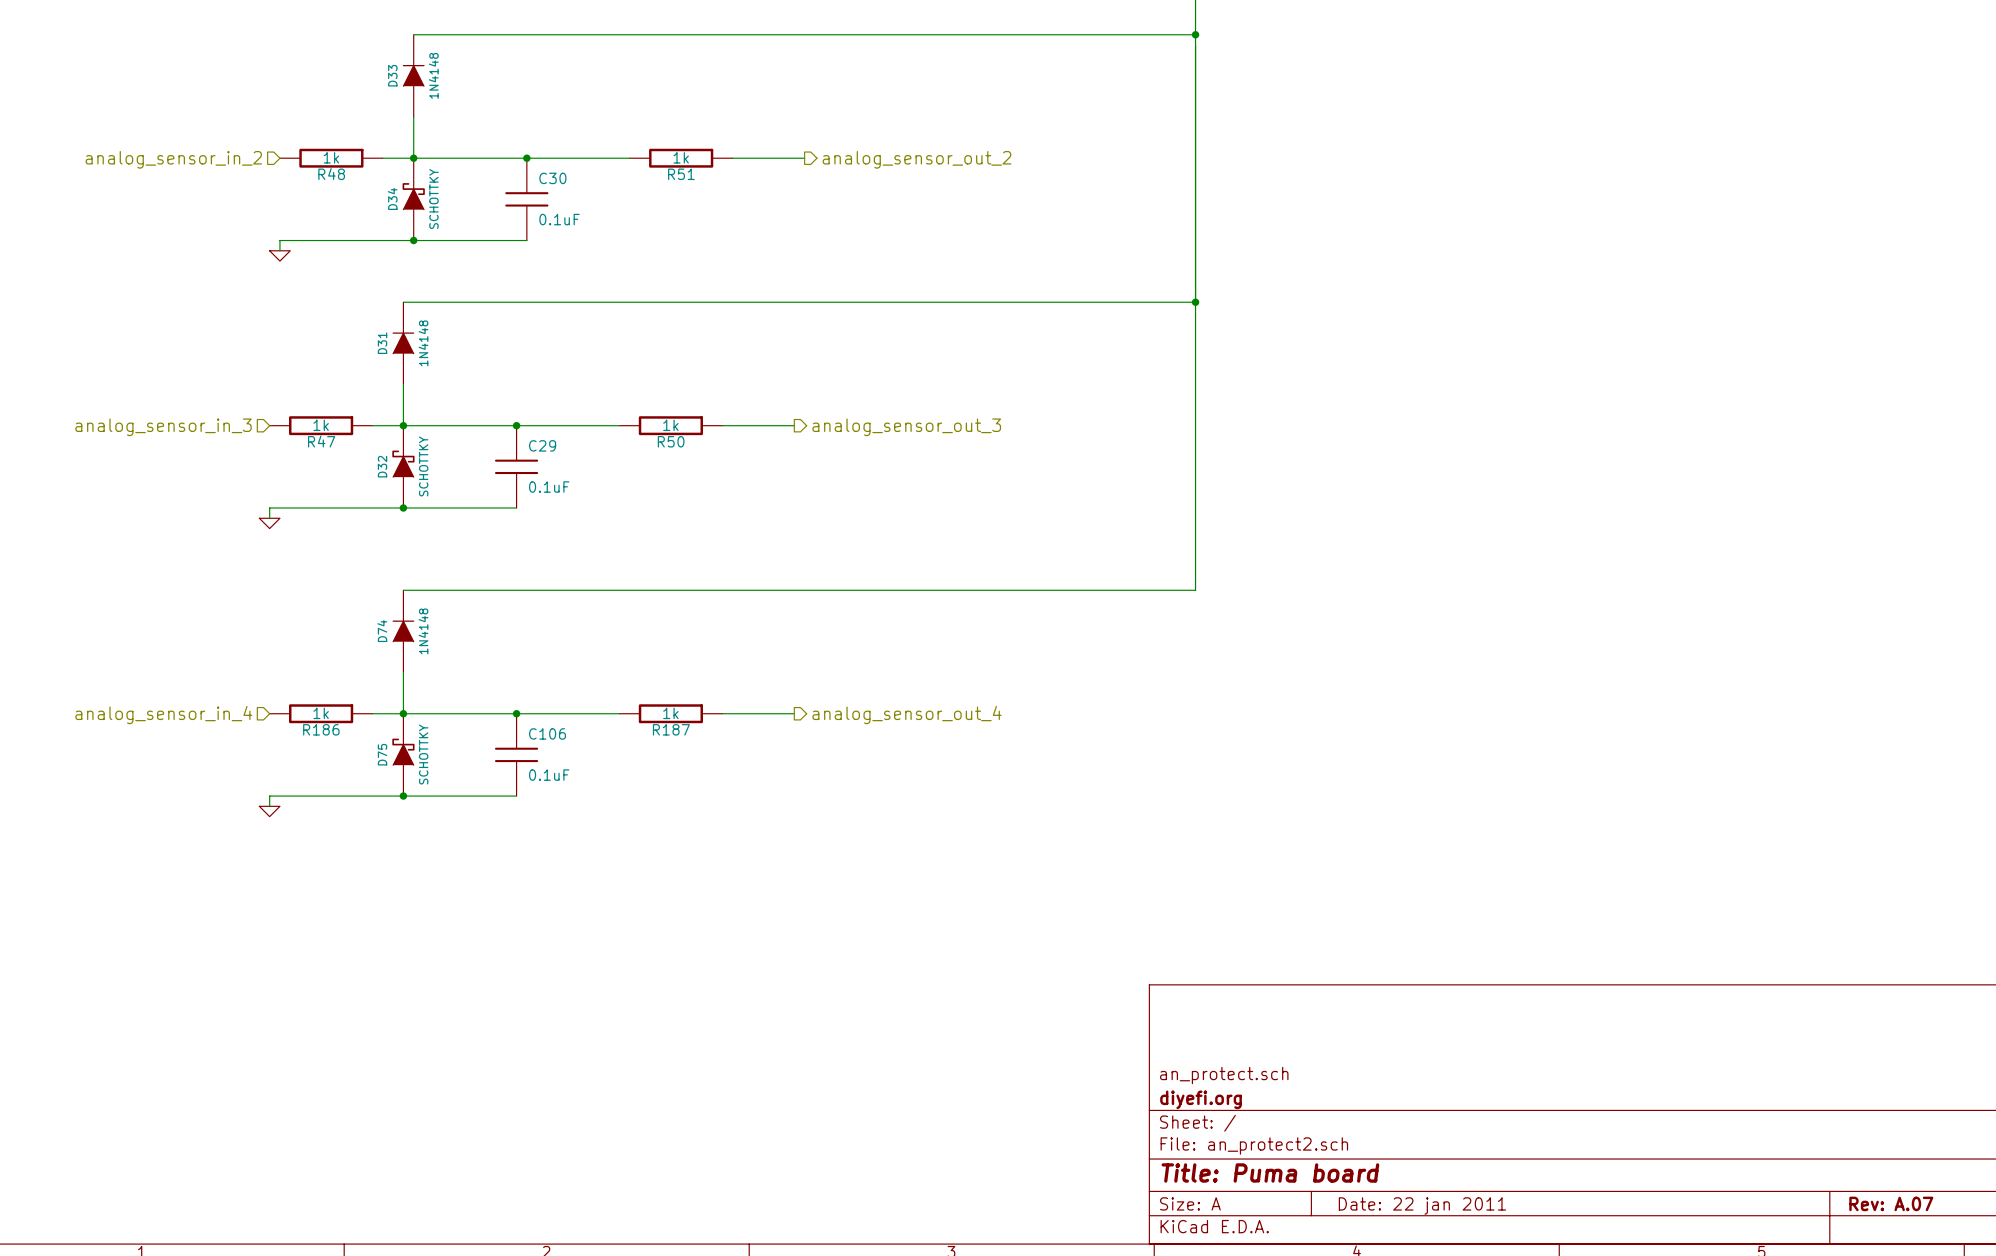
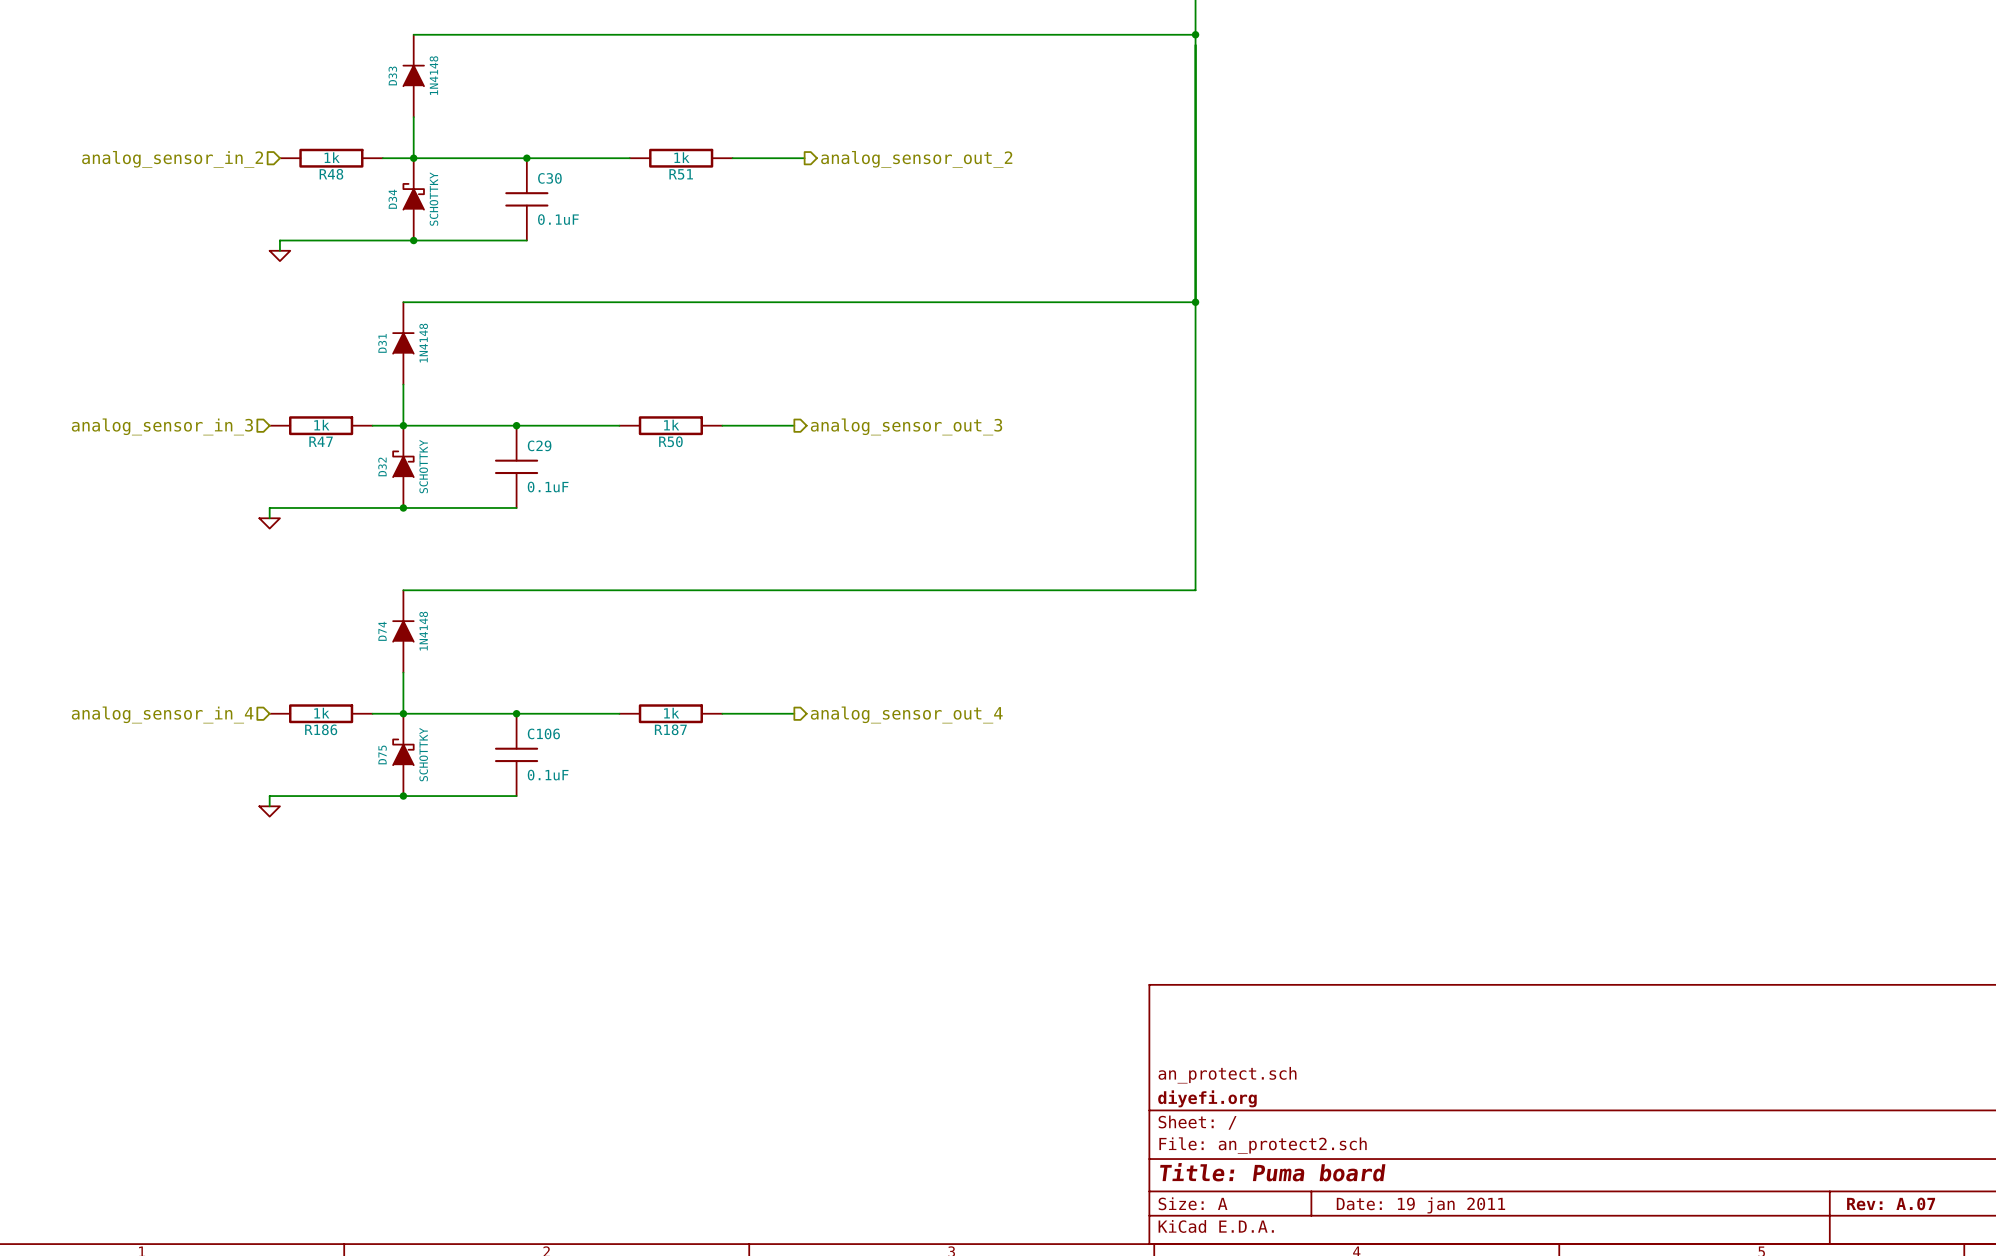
title block: Date: 22 jan 2011 (1422, 1205) -> Date: 19 jan 2011 (1420, 1205)

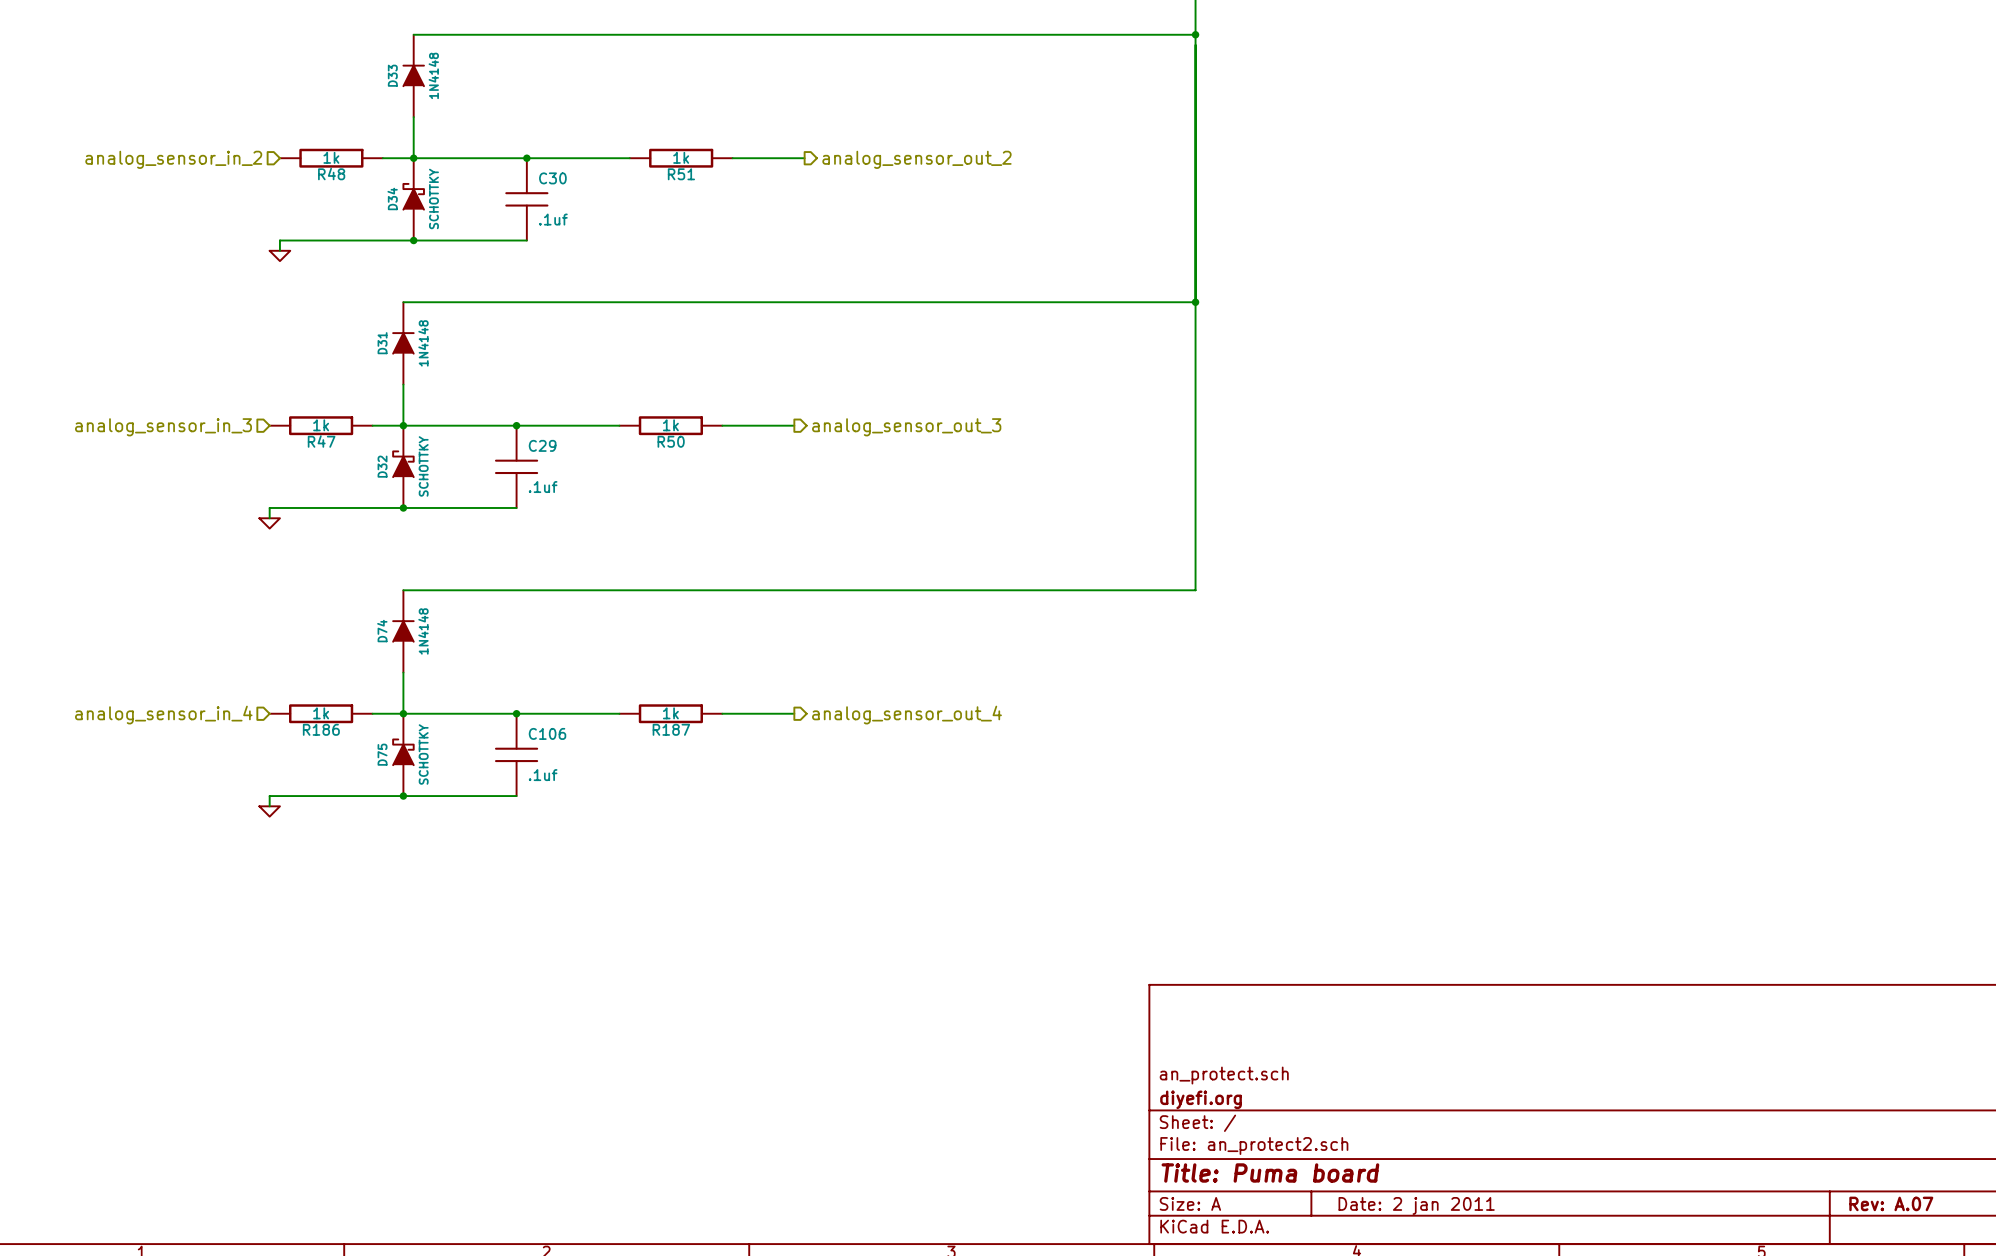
C30 value: 0.1uF (558, 219) -> .1uf (553, 219)
C29 value: 0.1uF (548, 487) -> .1uf (543, 487)
C106 value: 0.1uF (548, 775) -> .1uf (543, 775)
title block: Date: 19 jan 2011 (1420, 1205) -> Date: 2 jan 2011 (1416, 1205)

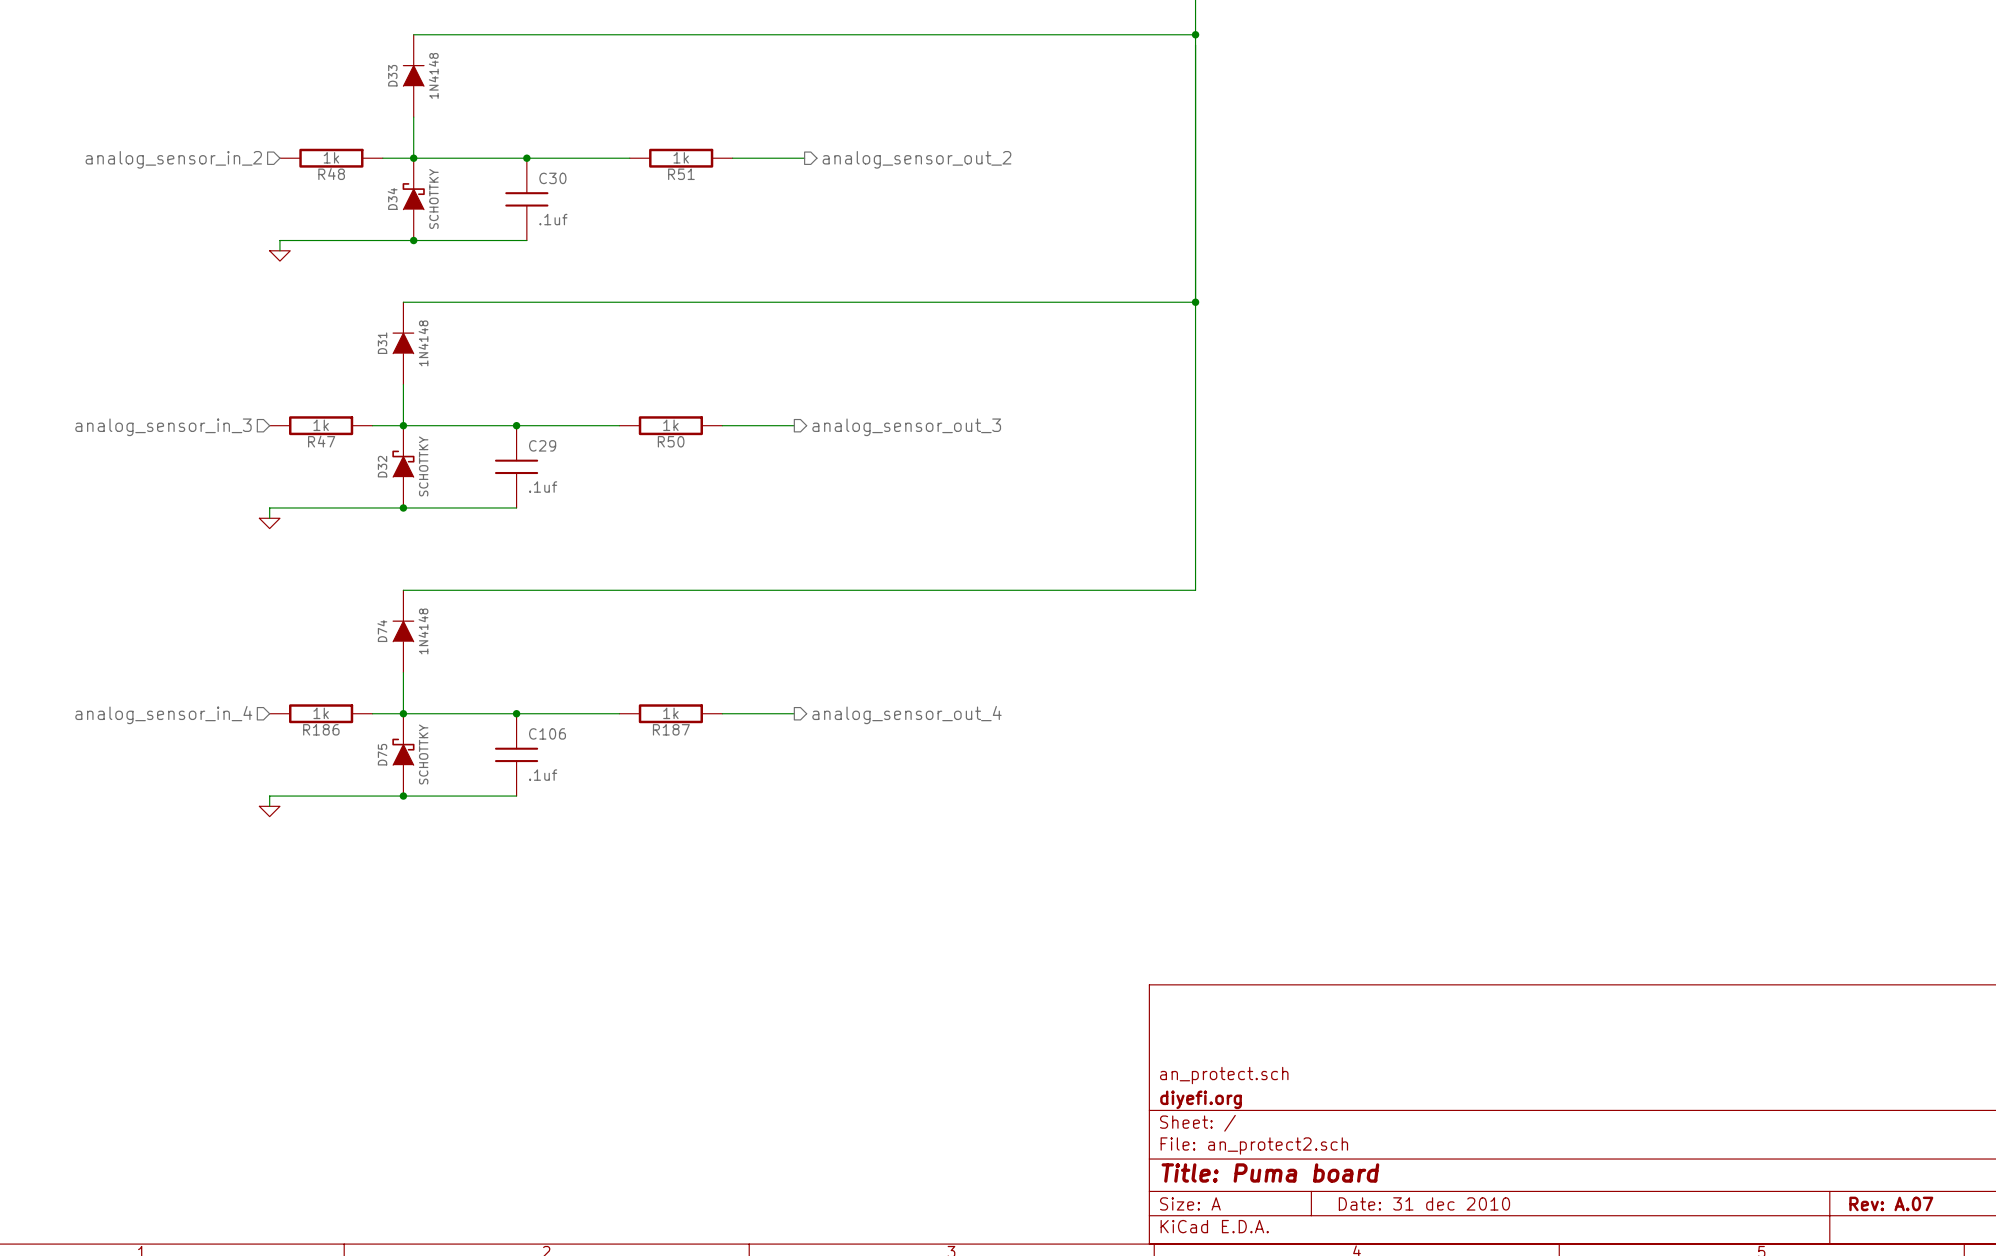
title block: Date: 2 jan 2011 (1416, 1205) -> Date: 31 dec 2010 (1424, 1203)

